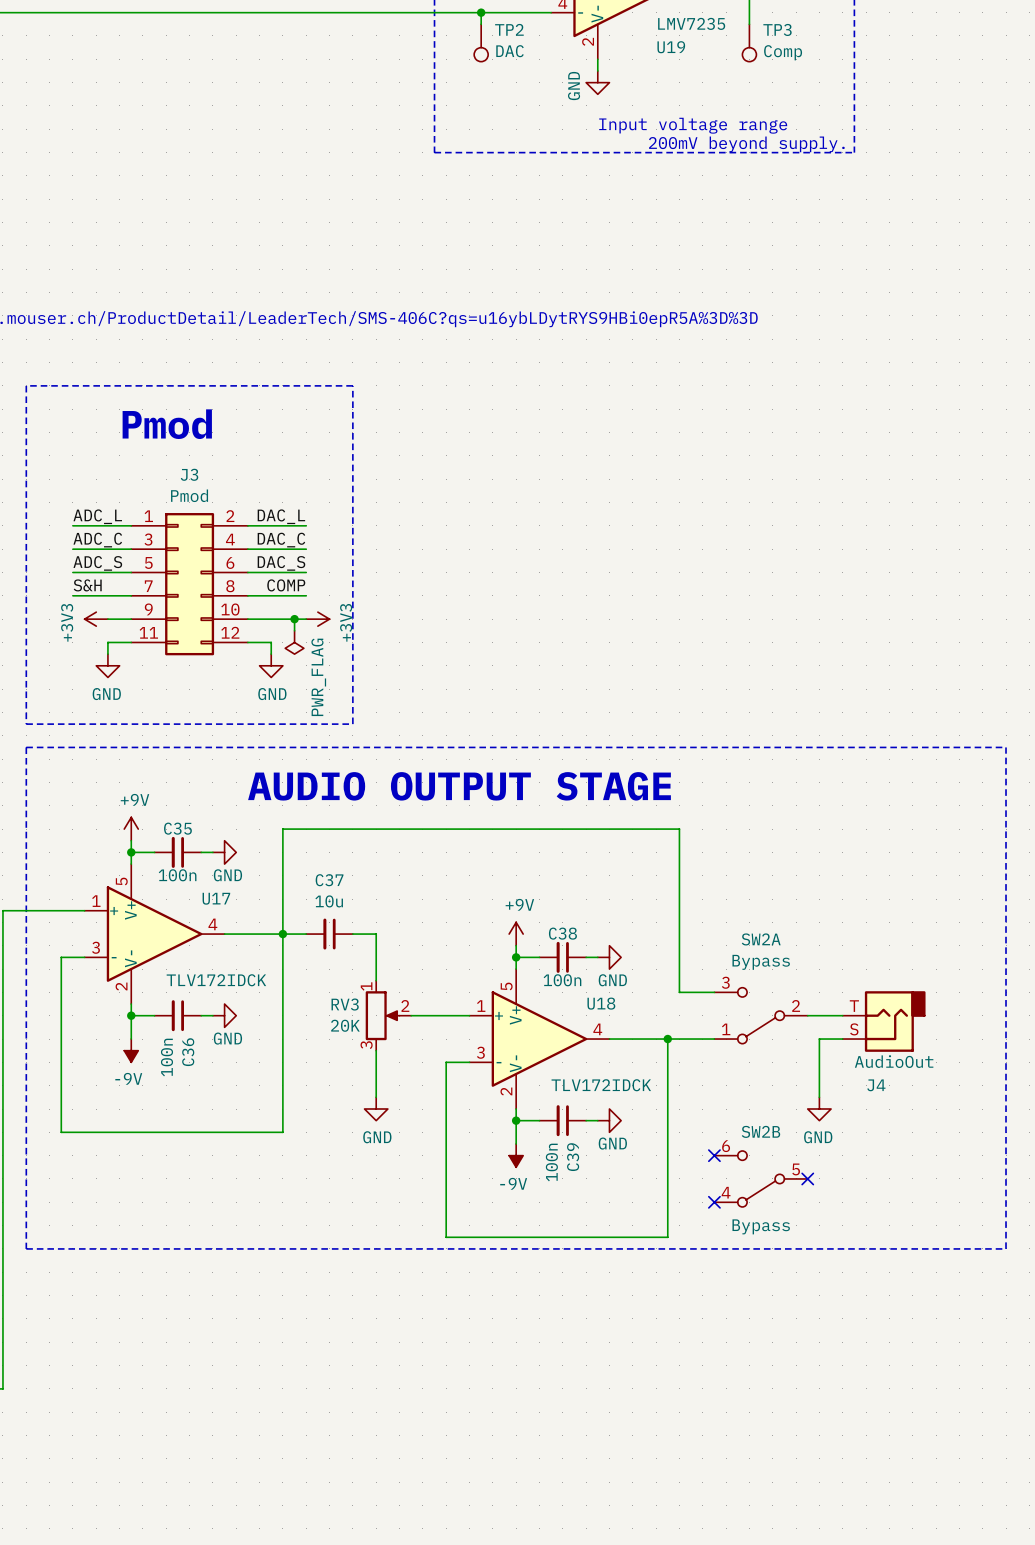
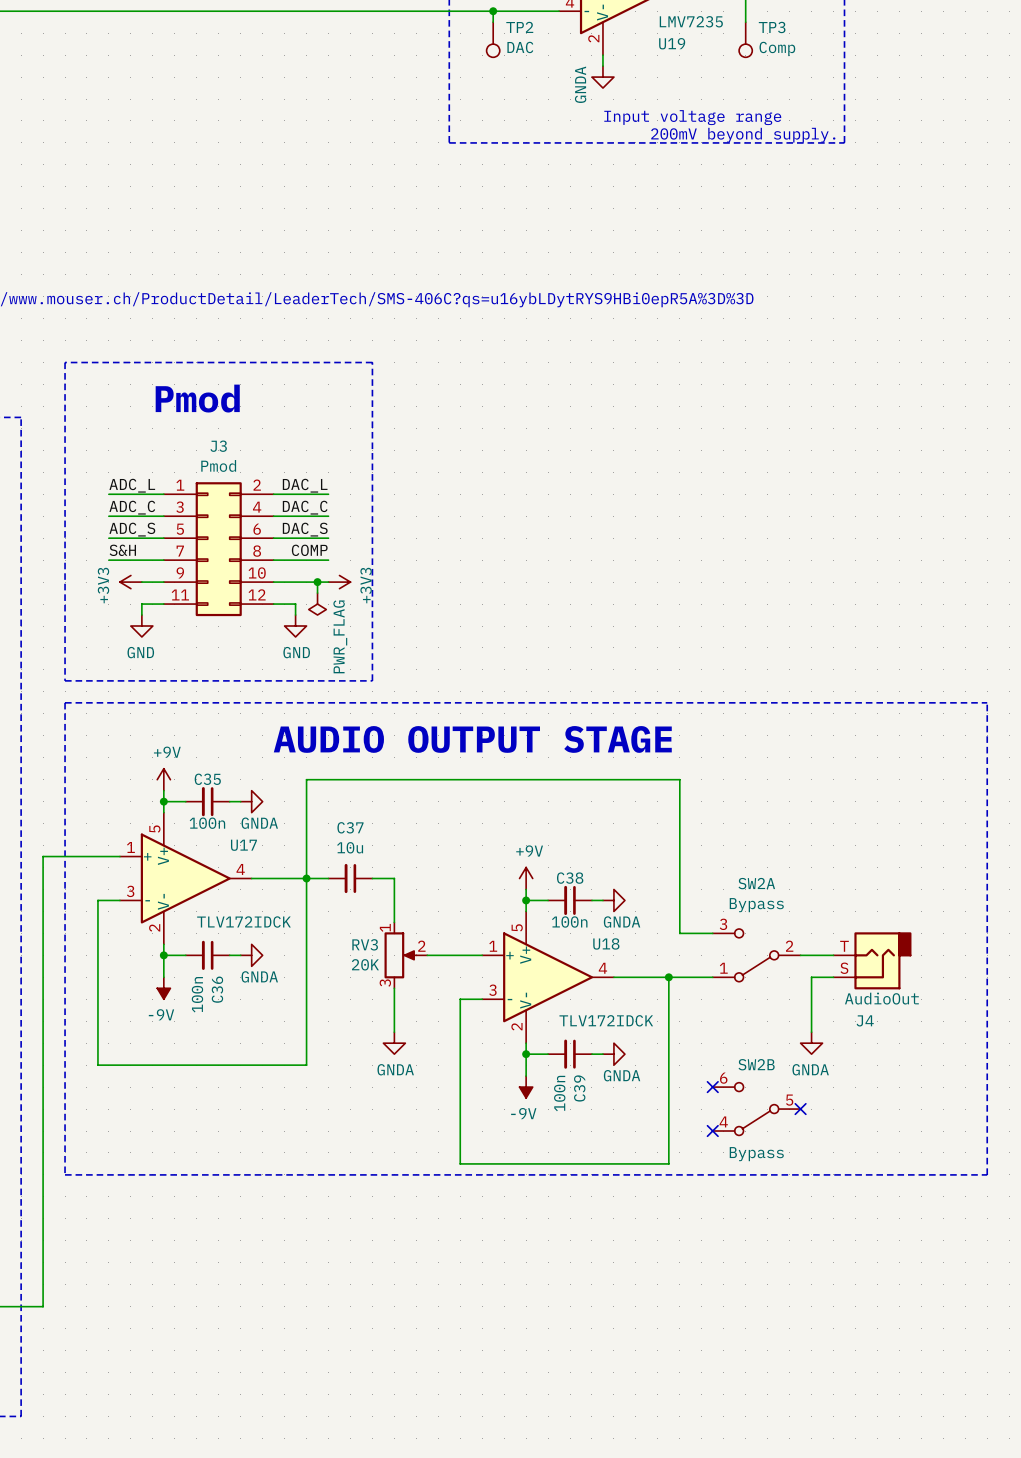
power symbol: GND (597, 82) -> GNDA (602, 77)
power symbol: GND (224, 852) -> GNDA (251, 801)
power symbol: GND (609, 957) -> GNDA (613, 900)
power symbol: GND (224, 1015) -> GNDA (251, 955)
power symbol: GND (376, 1109) -> GNDA (394, 1043)
power symbol: GND (819, 1109) -> GNDA (811, 1043)
power symbol: GND (609, 1120) -> GNDA (613, 1054)

